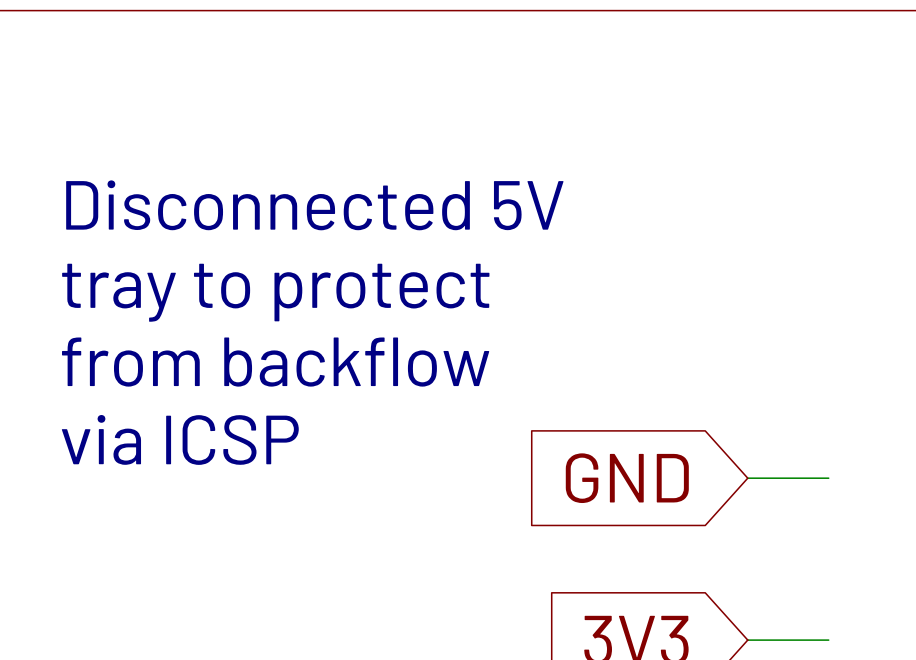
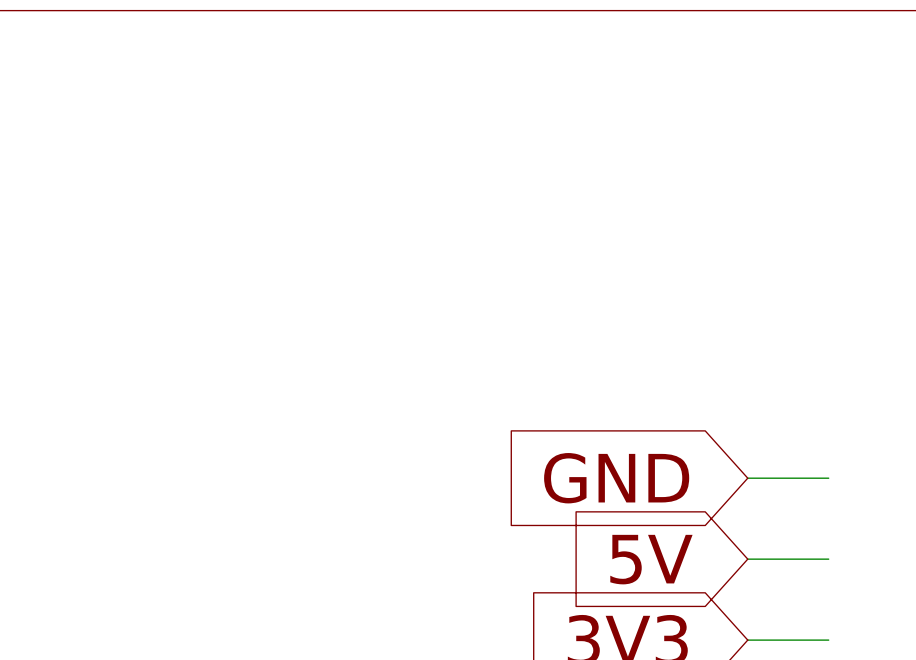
text: Disconnected 5V (314, 205) -> none
text: tray to protect (275, 292) -> none
text: from backflow (275, 362) -> none
text: via ICSP (180, 439) -> none
global label: none -> 5V (651, 559)
wire: none -> (747, 559) (828, 559)

